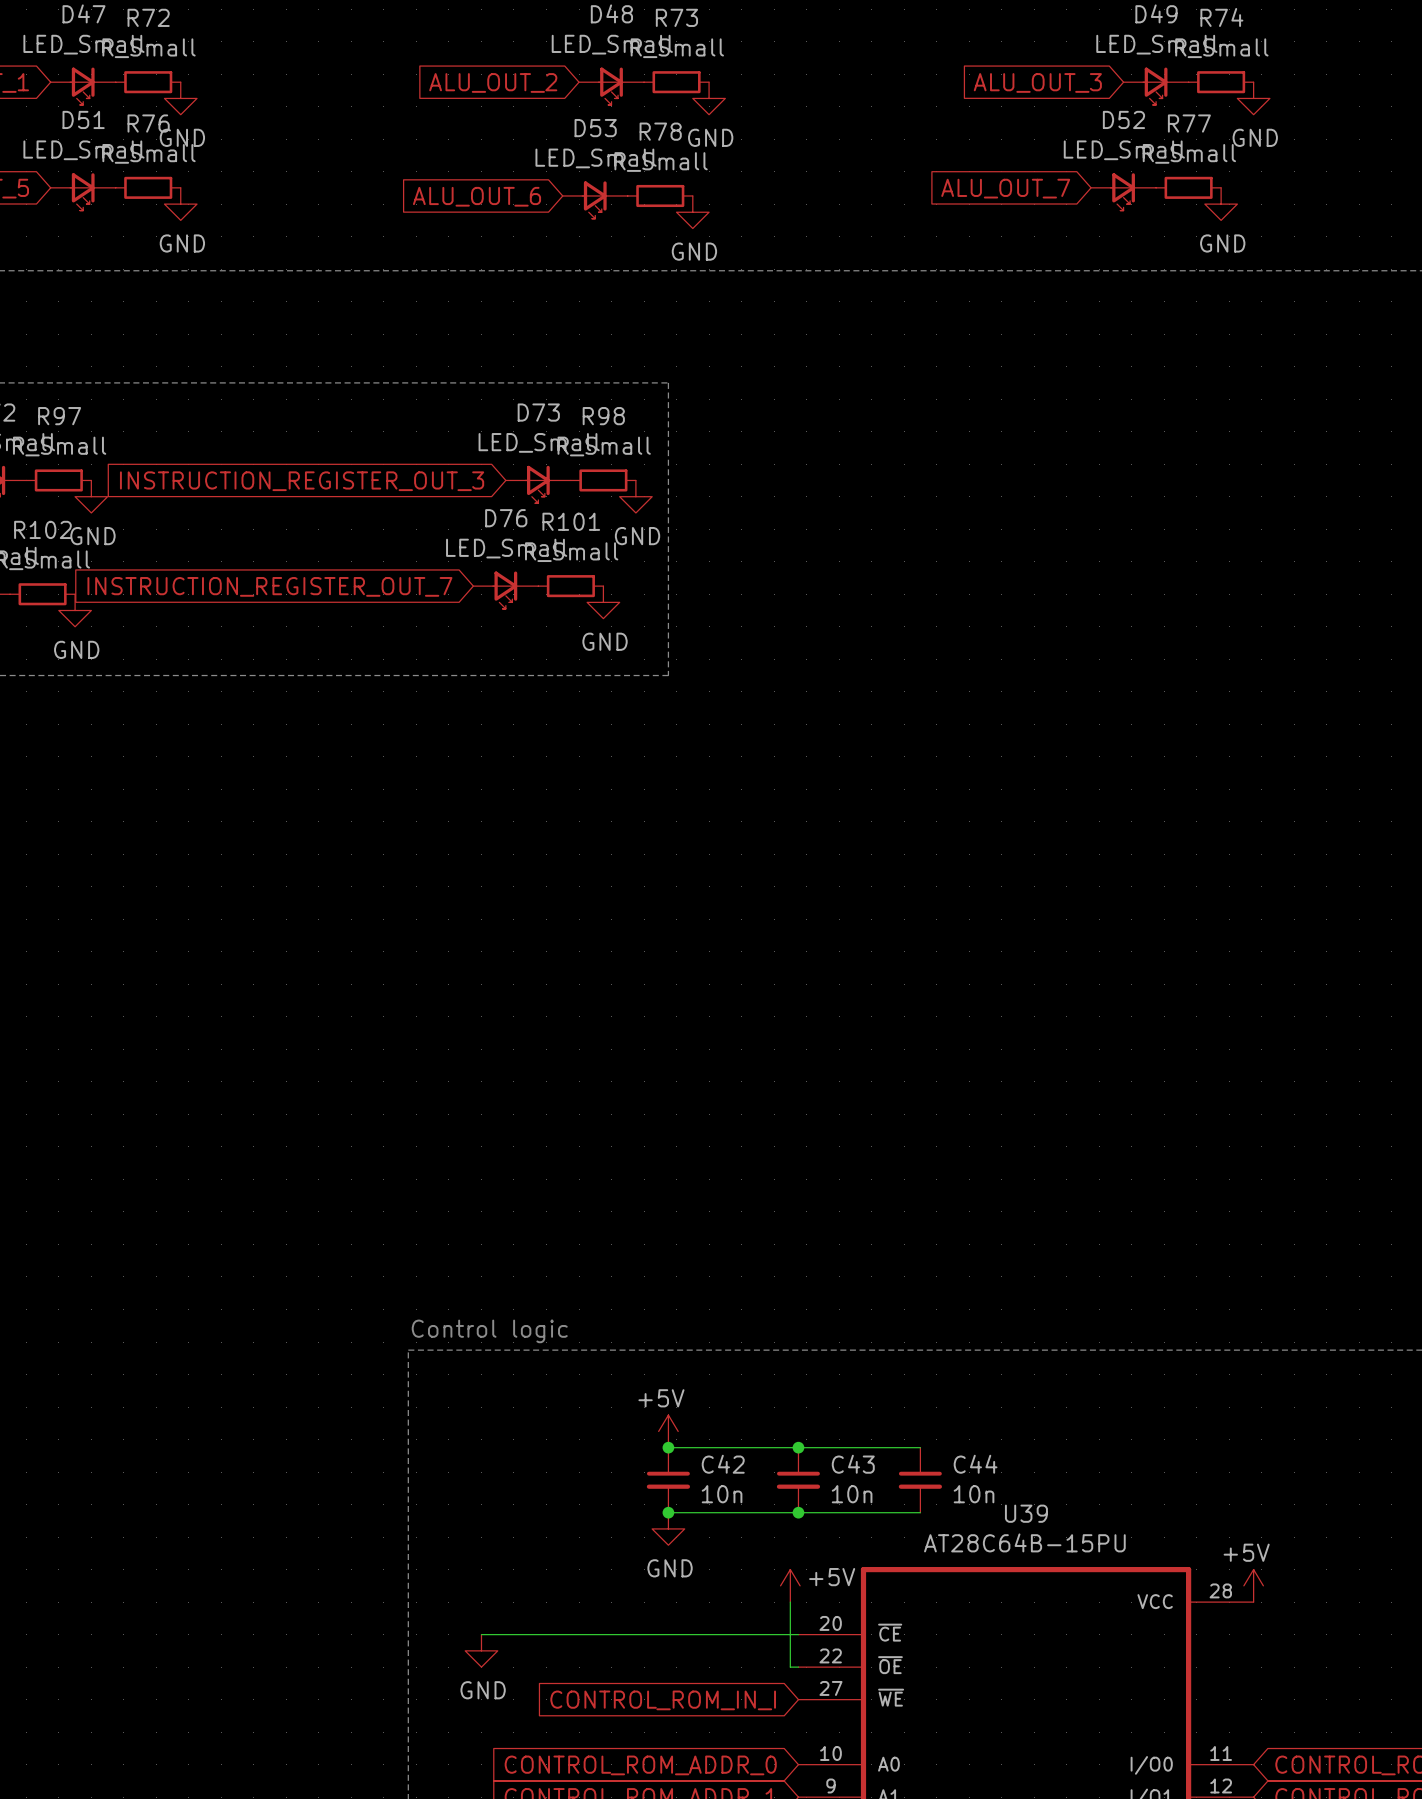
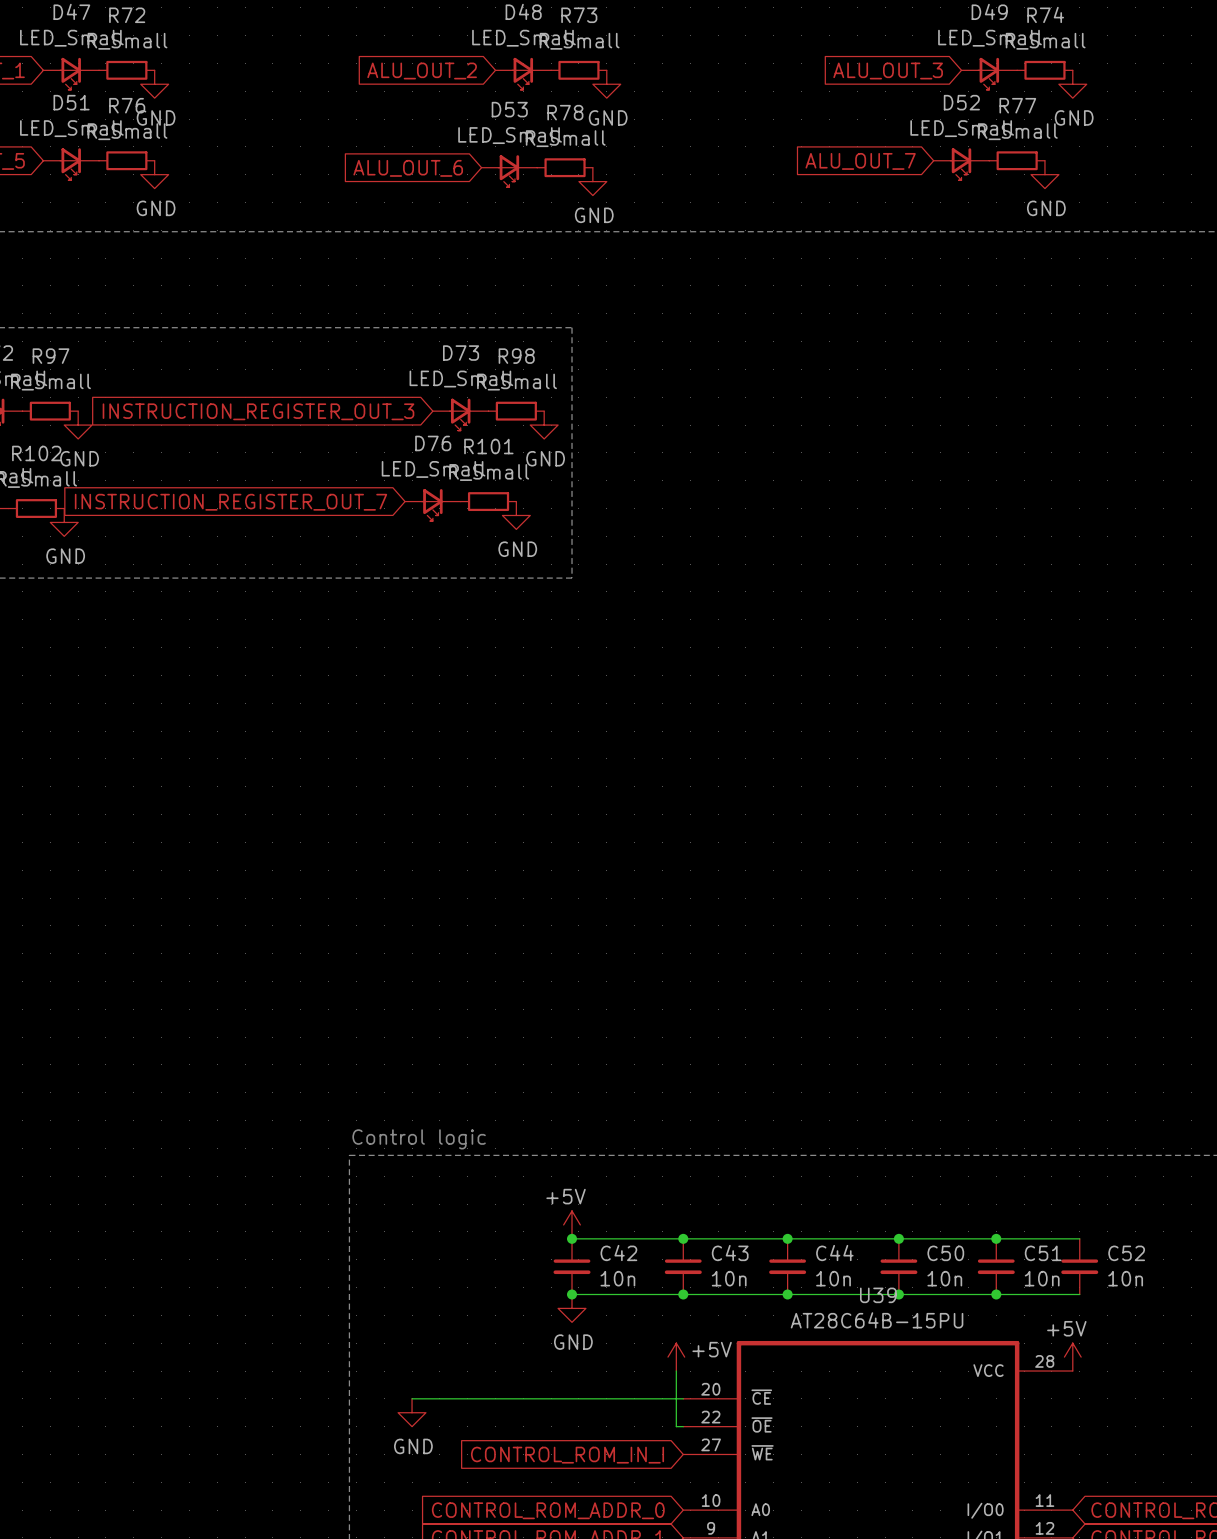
wire: none -> (787, 1238) (1079, 1238)
junction: none -> (787, 1238)
junction: none -> (898, 1238)
junction: none -> (996, 1238)
C50: none -> 10n (898, 1266)
C51: none -> 10n (996, 1266)
C52: none -> 10n (1079, 1266)
wire: none -> (787, 1294) (1079, 1294)
junction: none -> (787, 1294)
junction: none -> (898, 1294)
junction: none -> (996, 1294)

